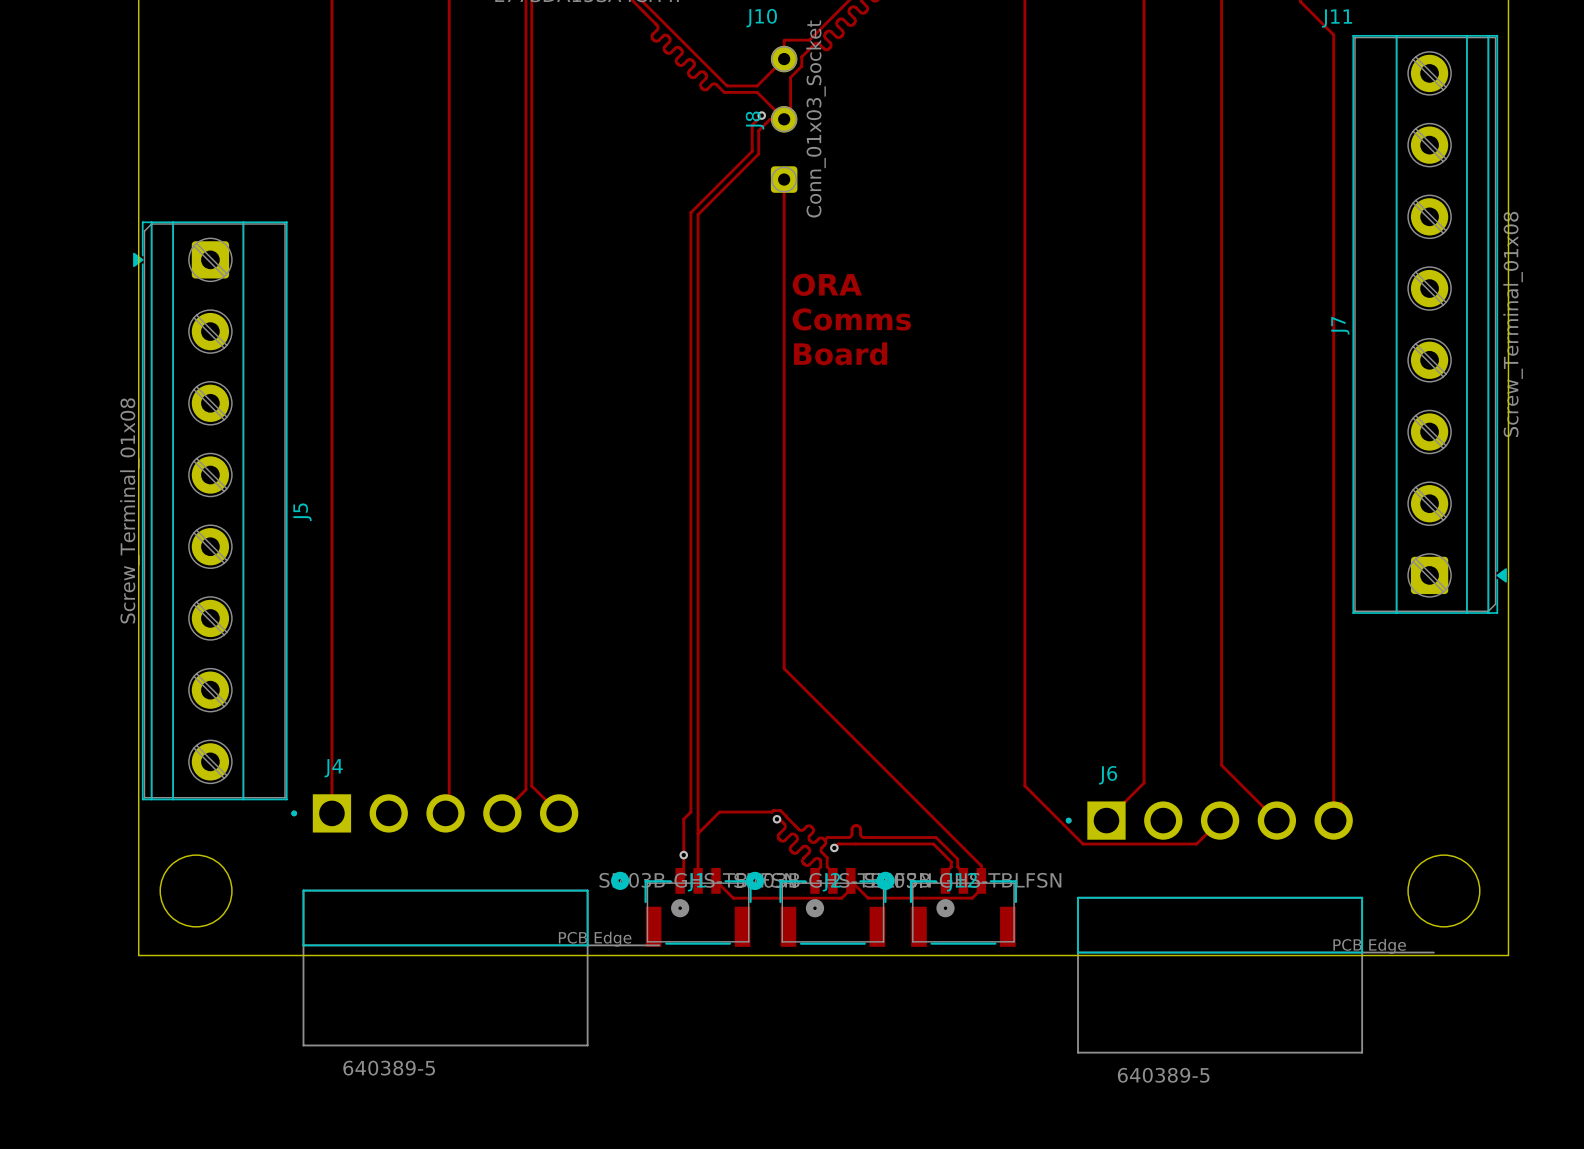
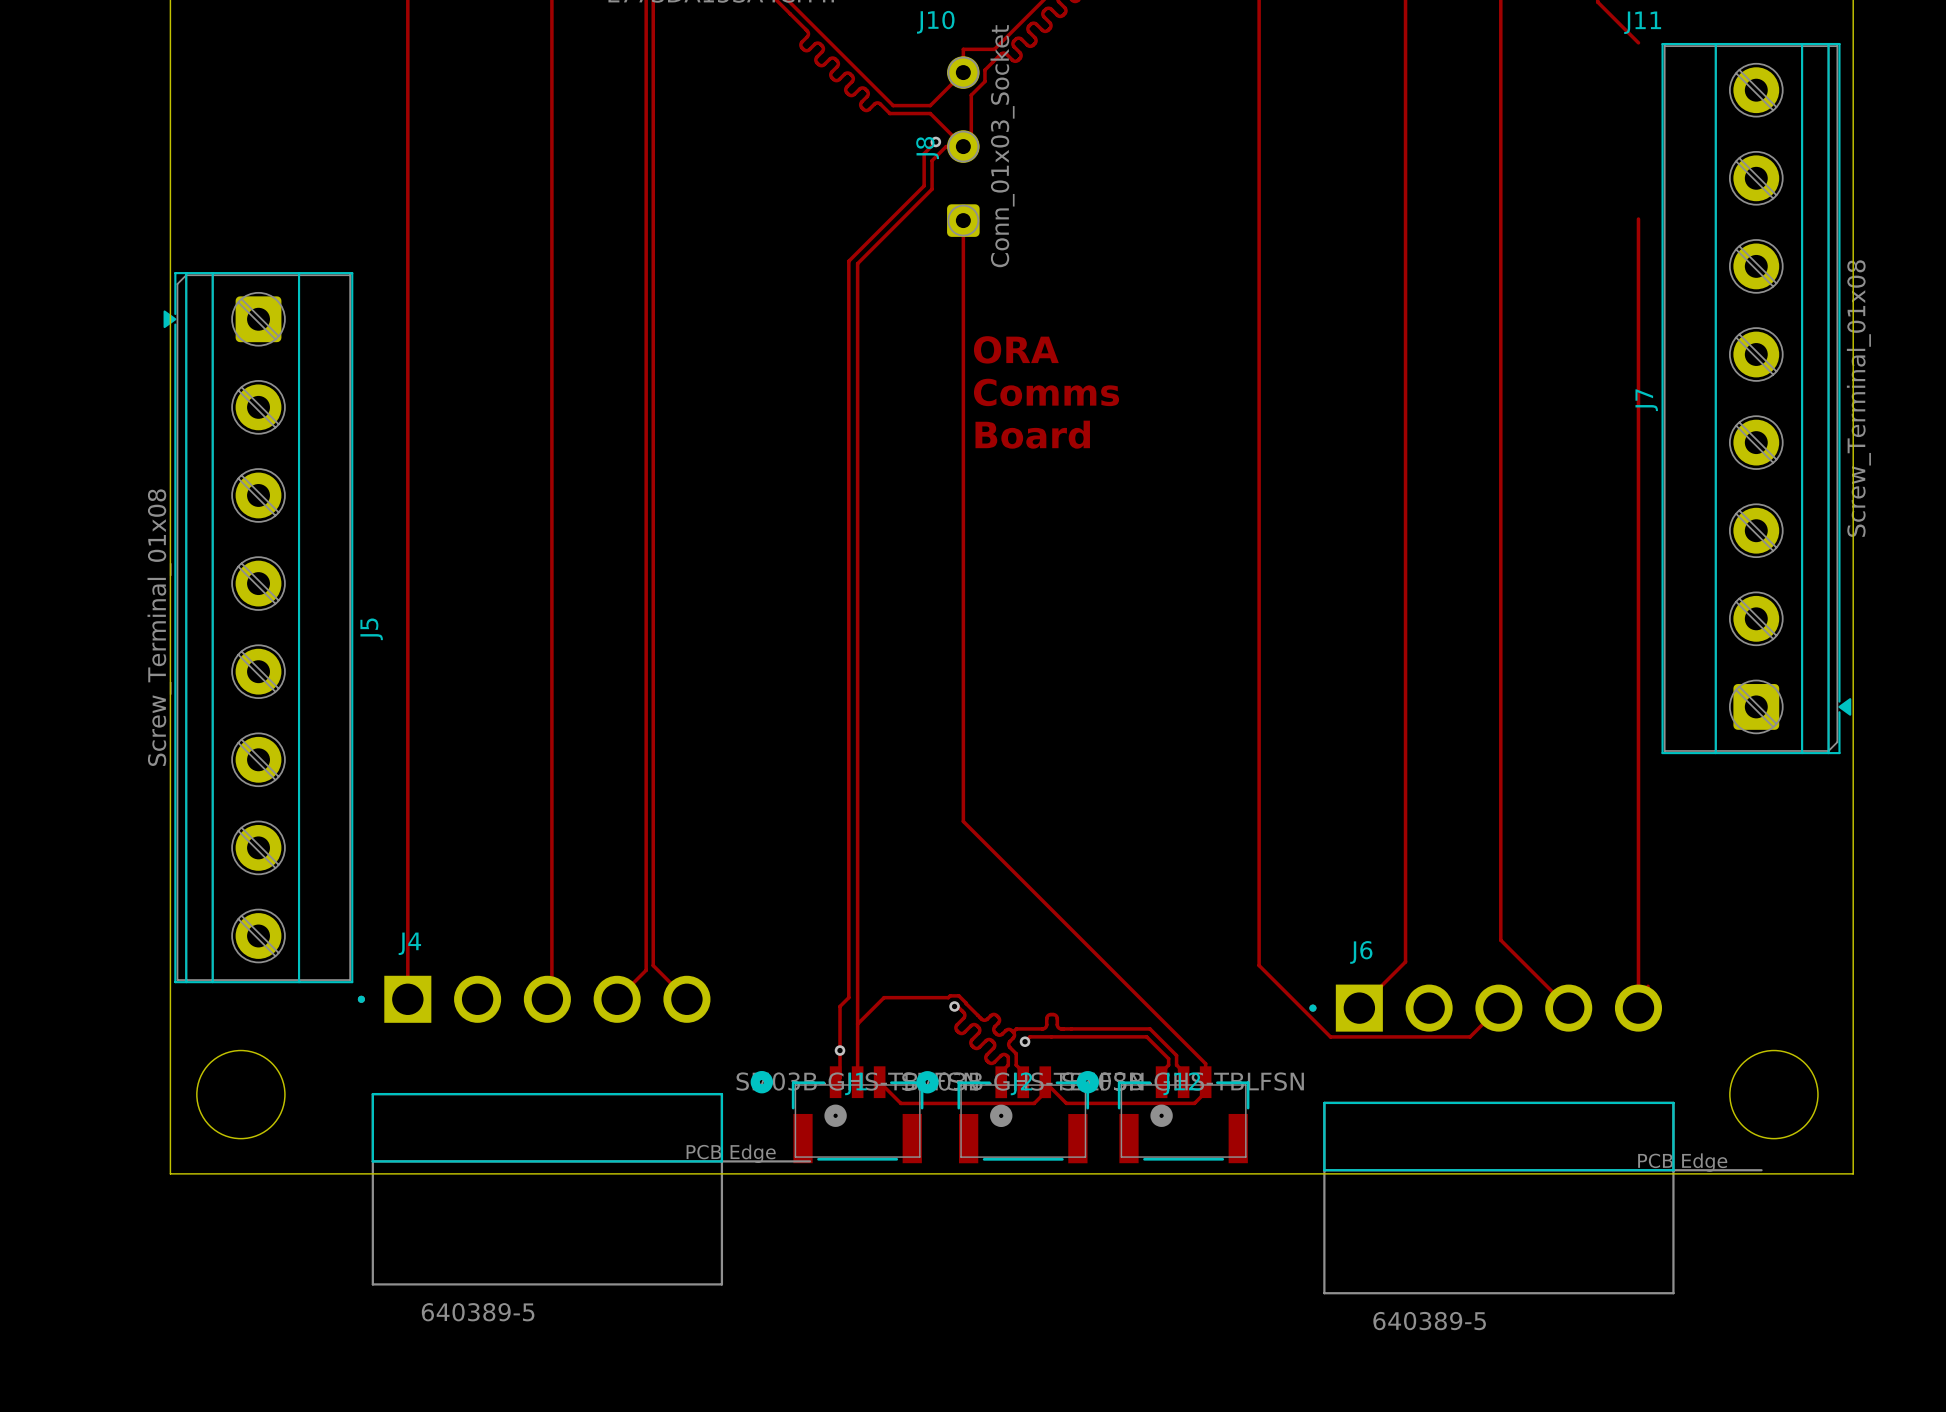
track: (1333, 34) (1333, 178) -> none

